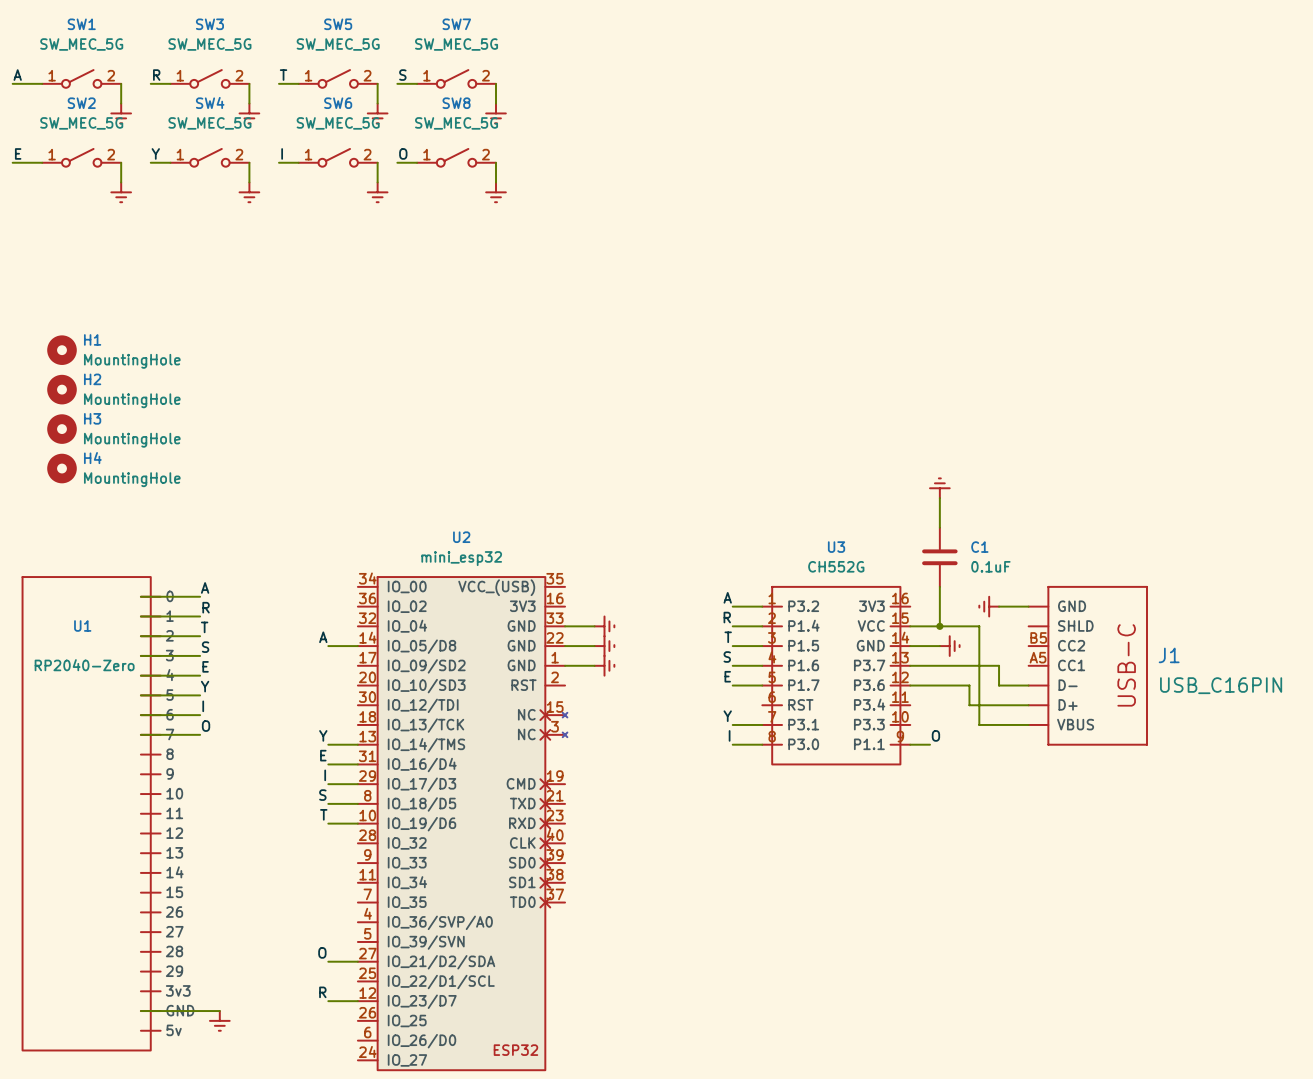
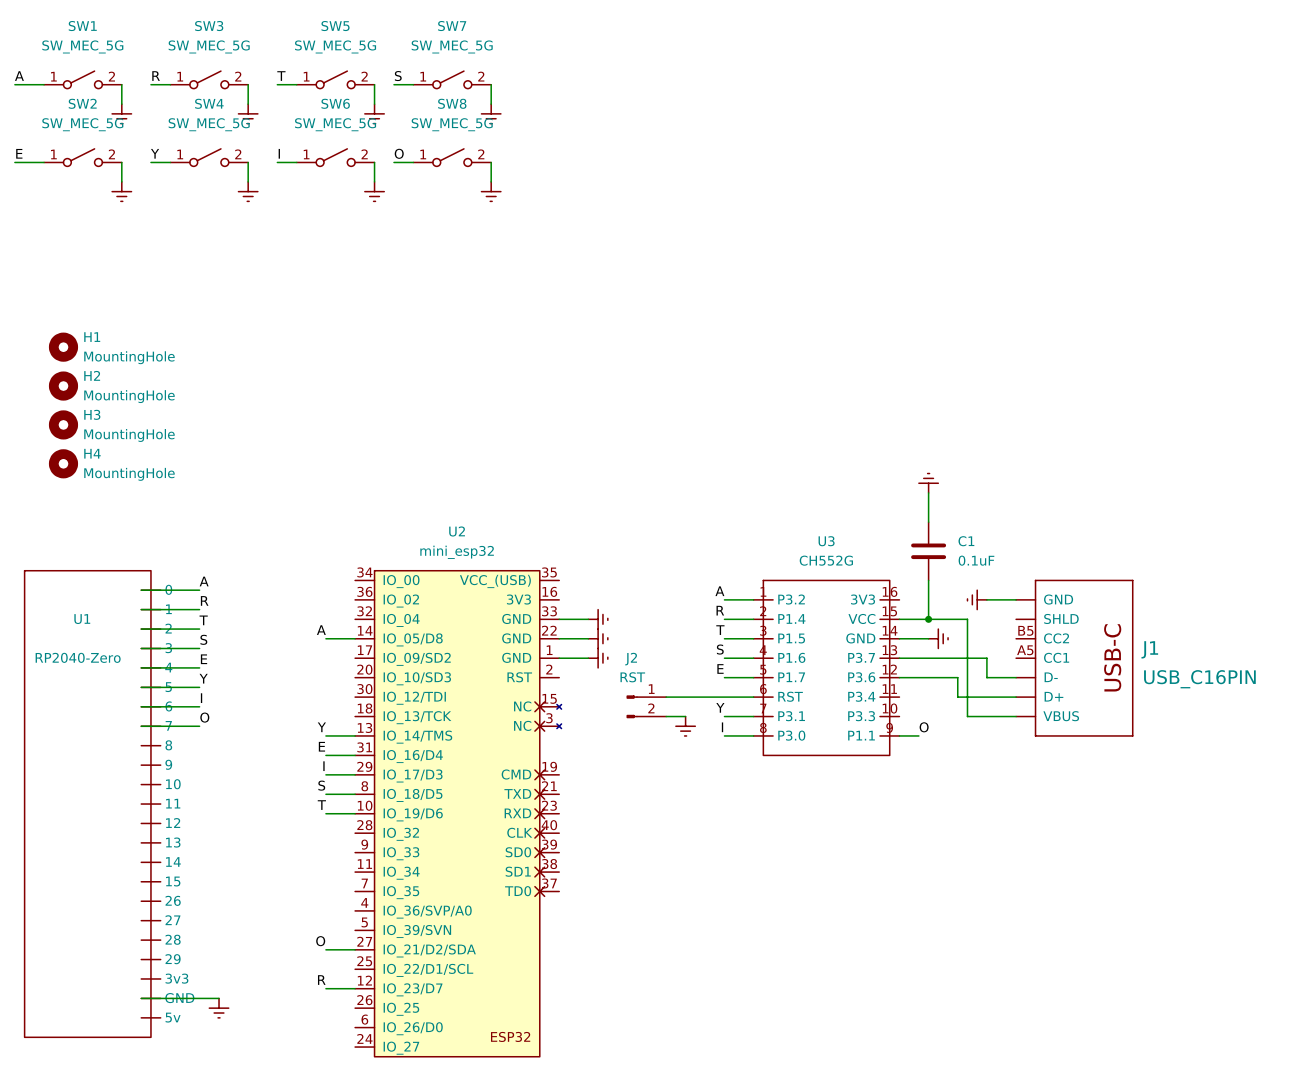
wire: none -> (666, 697) (753, 697)
J2: none -> RST (646, 706)
wire: none -> (666, 716) (685, 716)
power symbol: none -> (685, 726)

